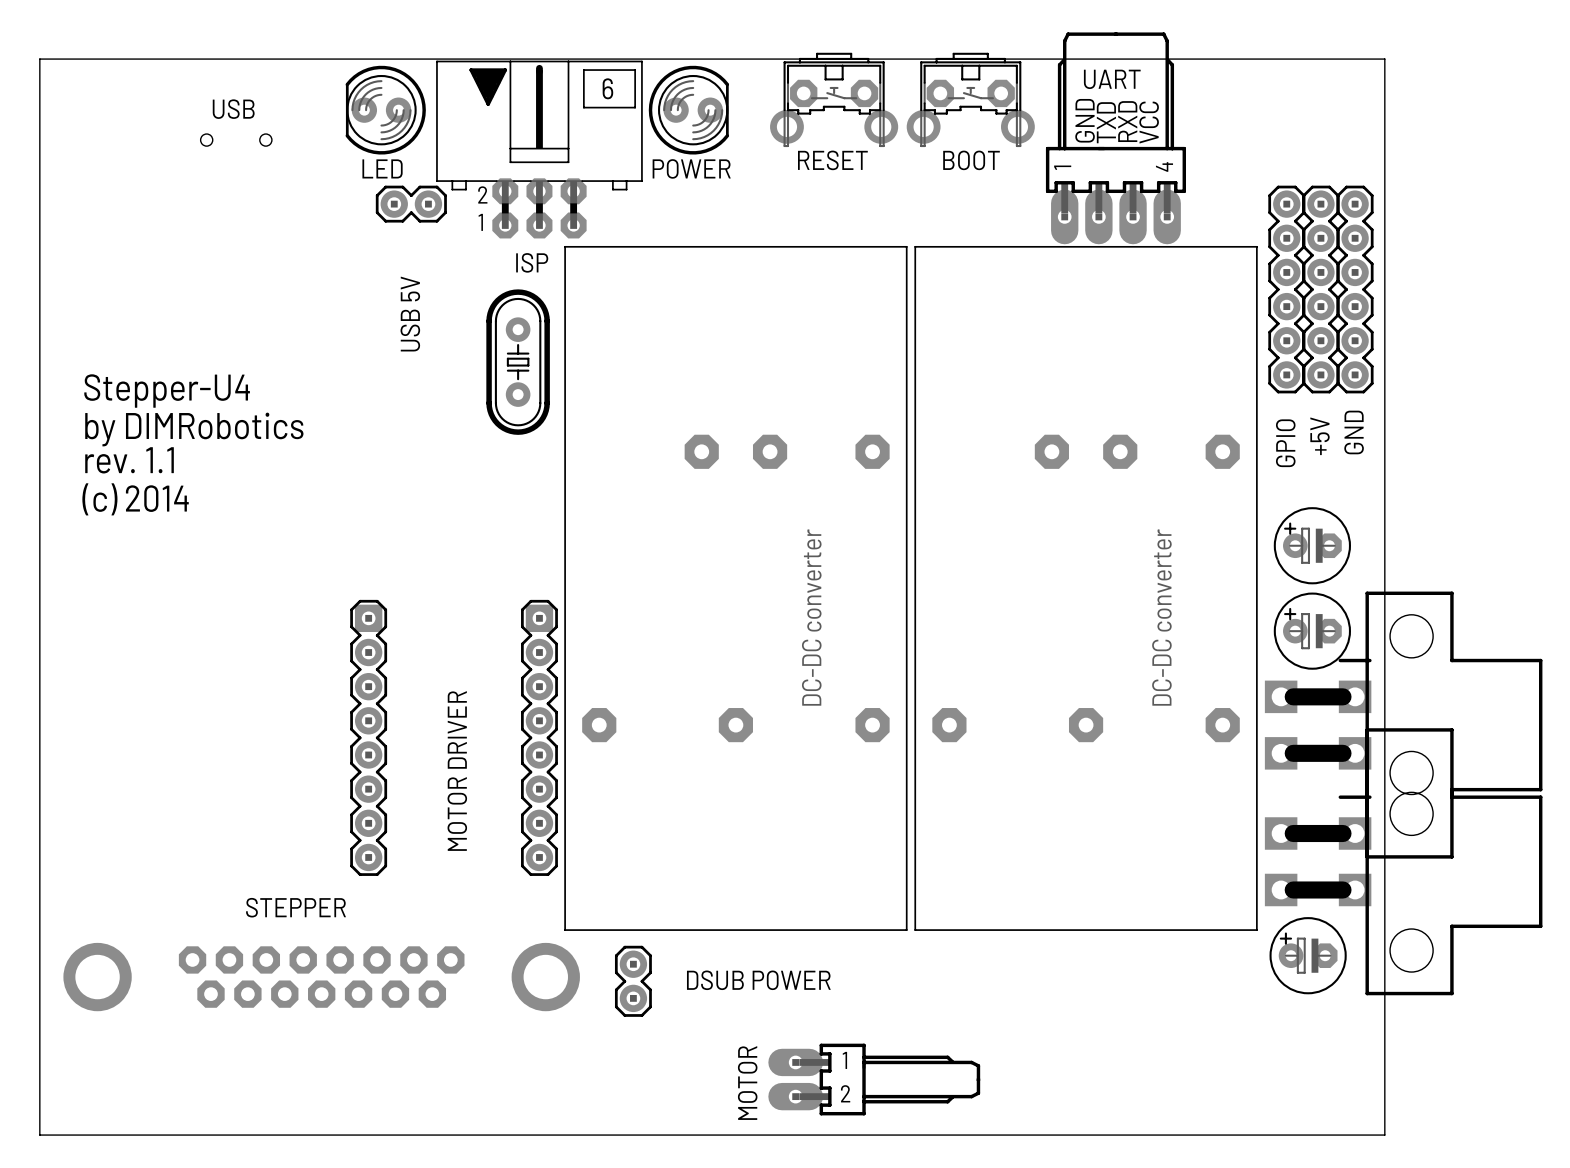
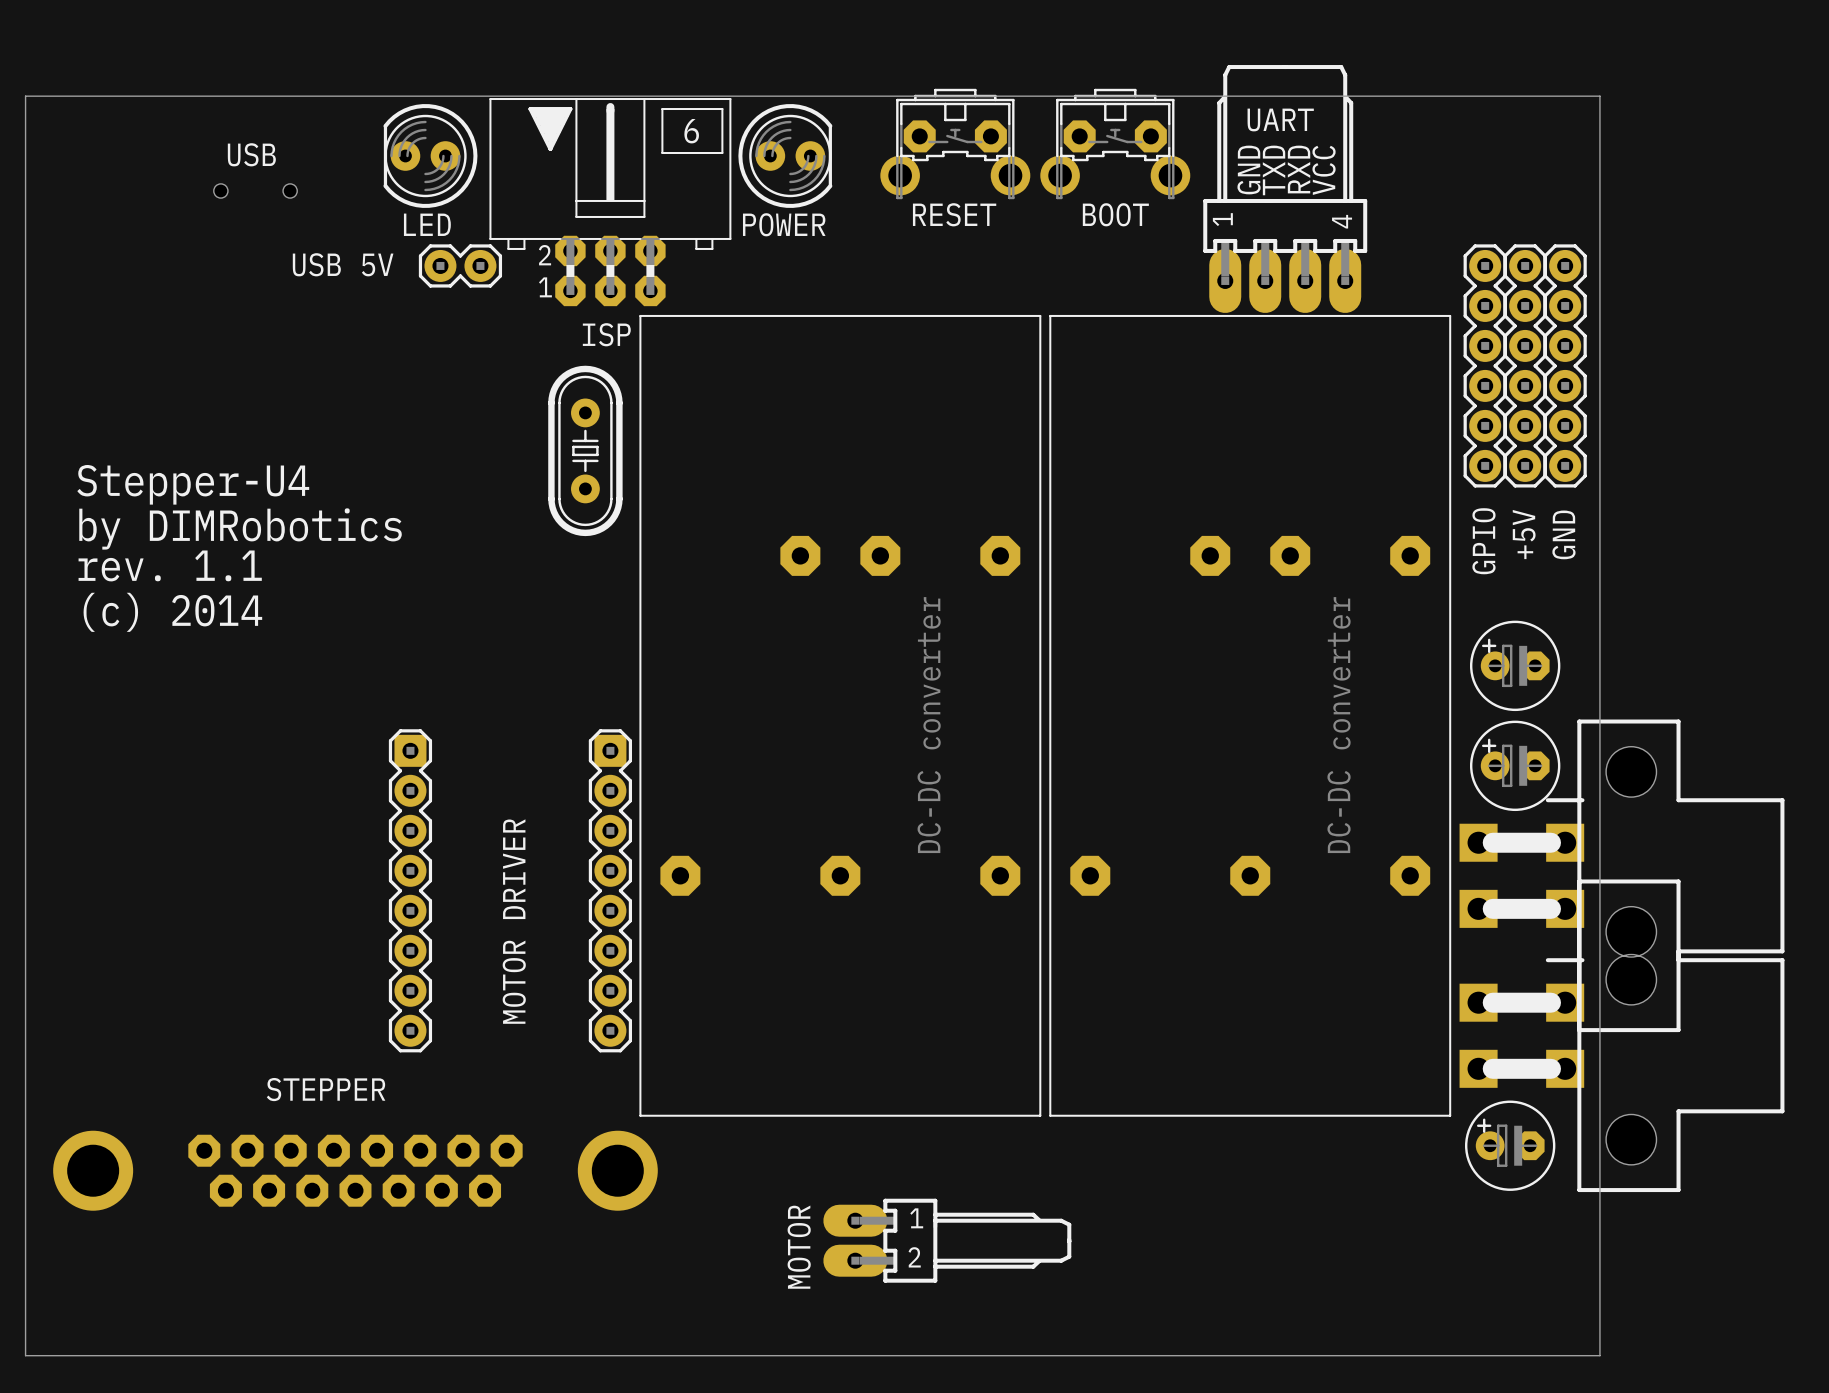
text rotation: 0° (410, 314) -> 90° clockwise (343, 264)
text position: USB 5V (410, 314) -> USB 5V (343, 264)
text: DSUB POWER (758, 980) -> none
part: (633, 981) -> none
part position: (874, 1079) -> (947, 1240)
text position: MOTOR (747, 1083) -> MOTOR (799, 1247)

